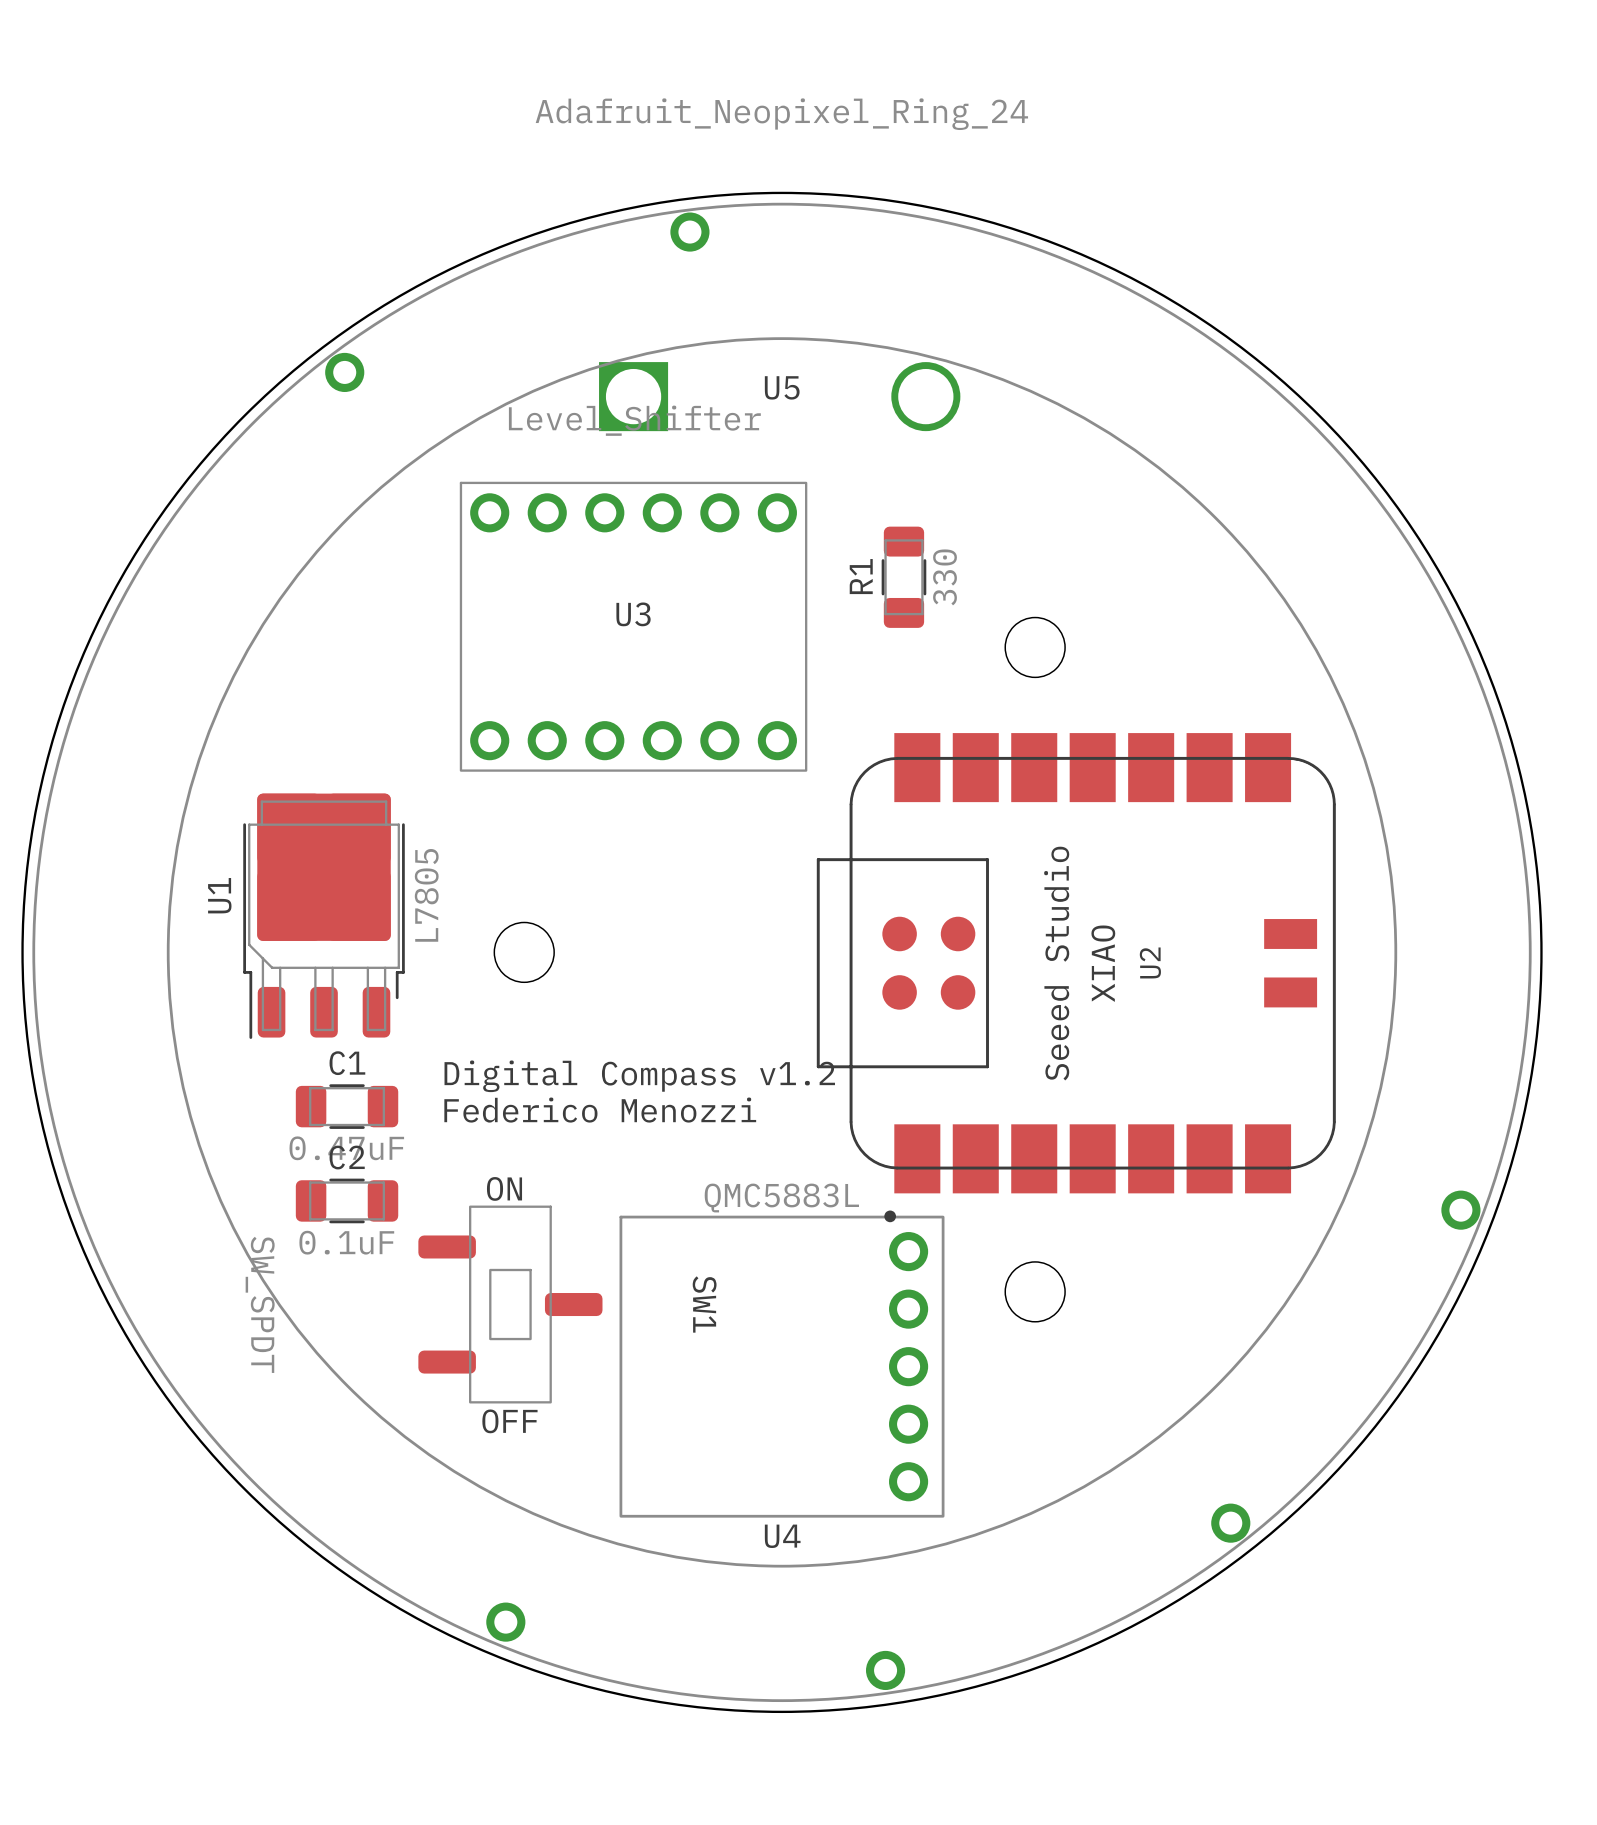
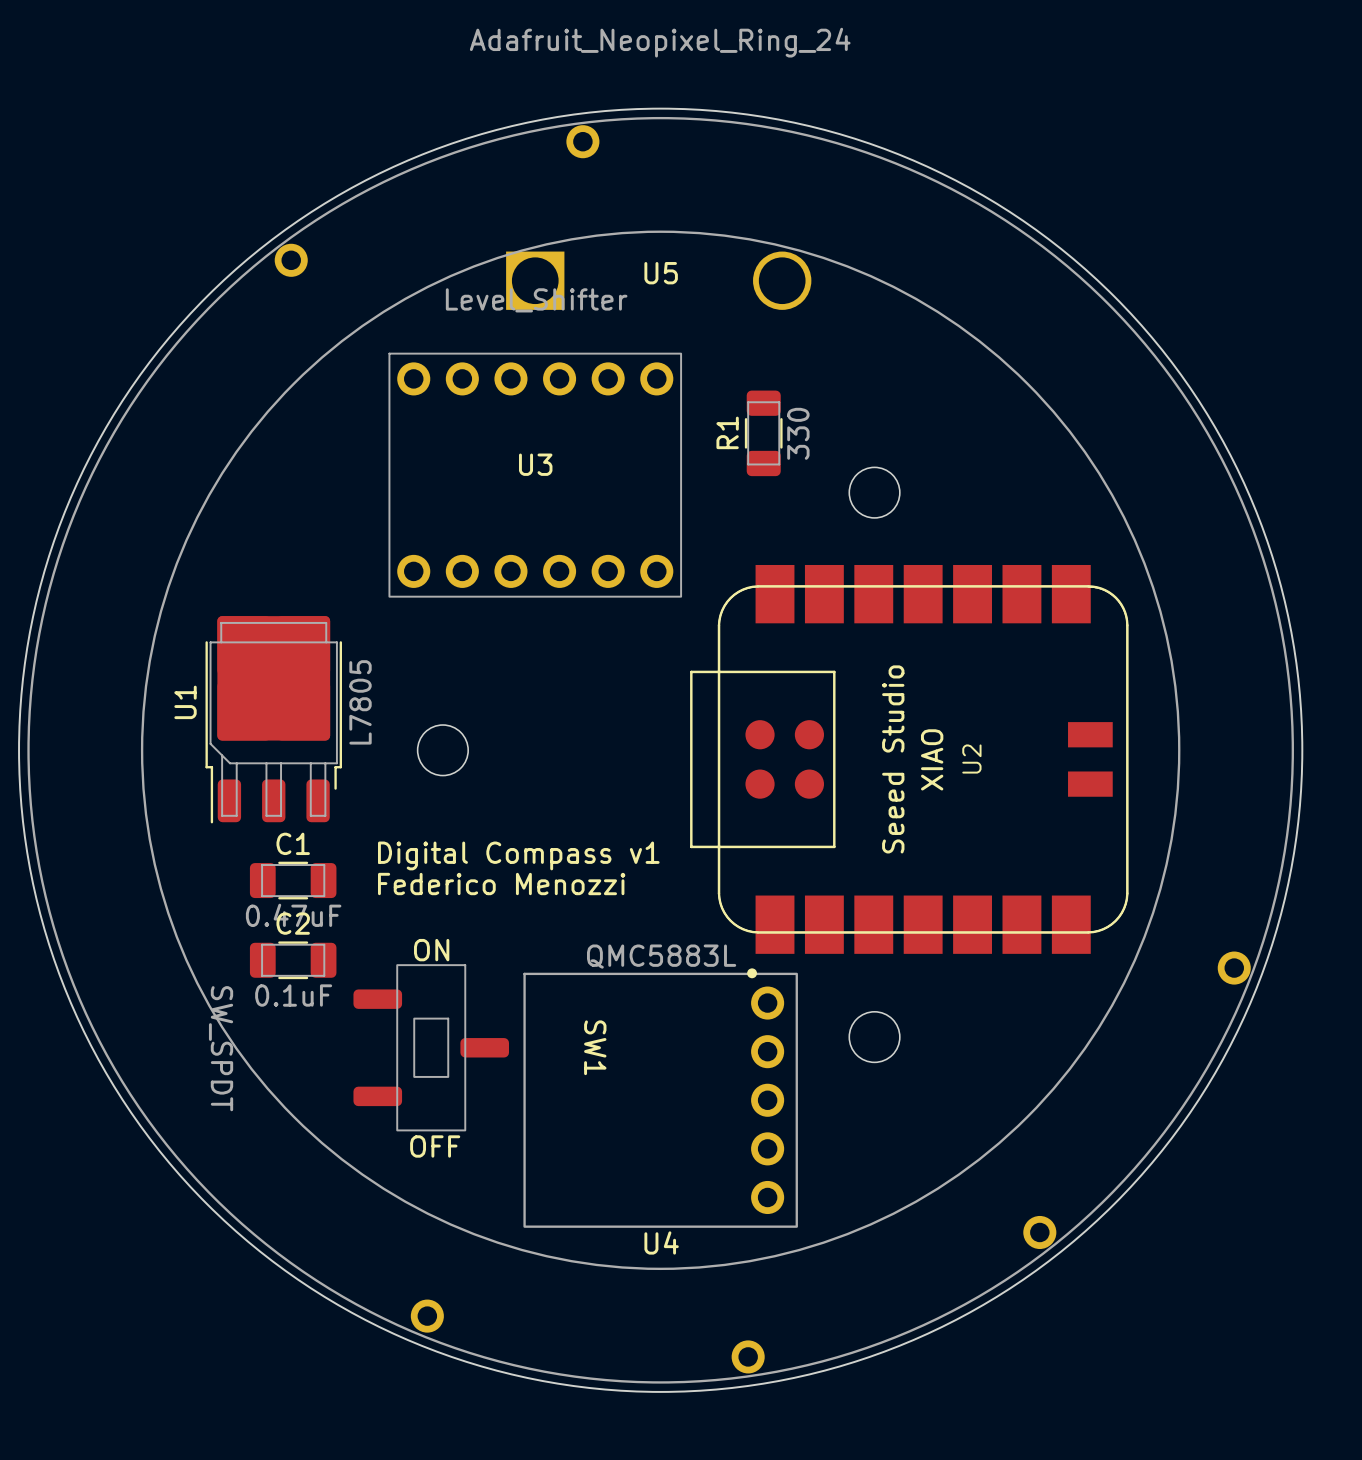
text: Digital Compass v1.2 (639, 1076) -> Digital Compass v1 (518, 855)

